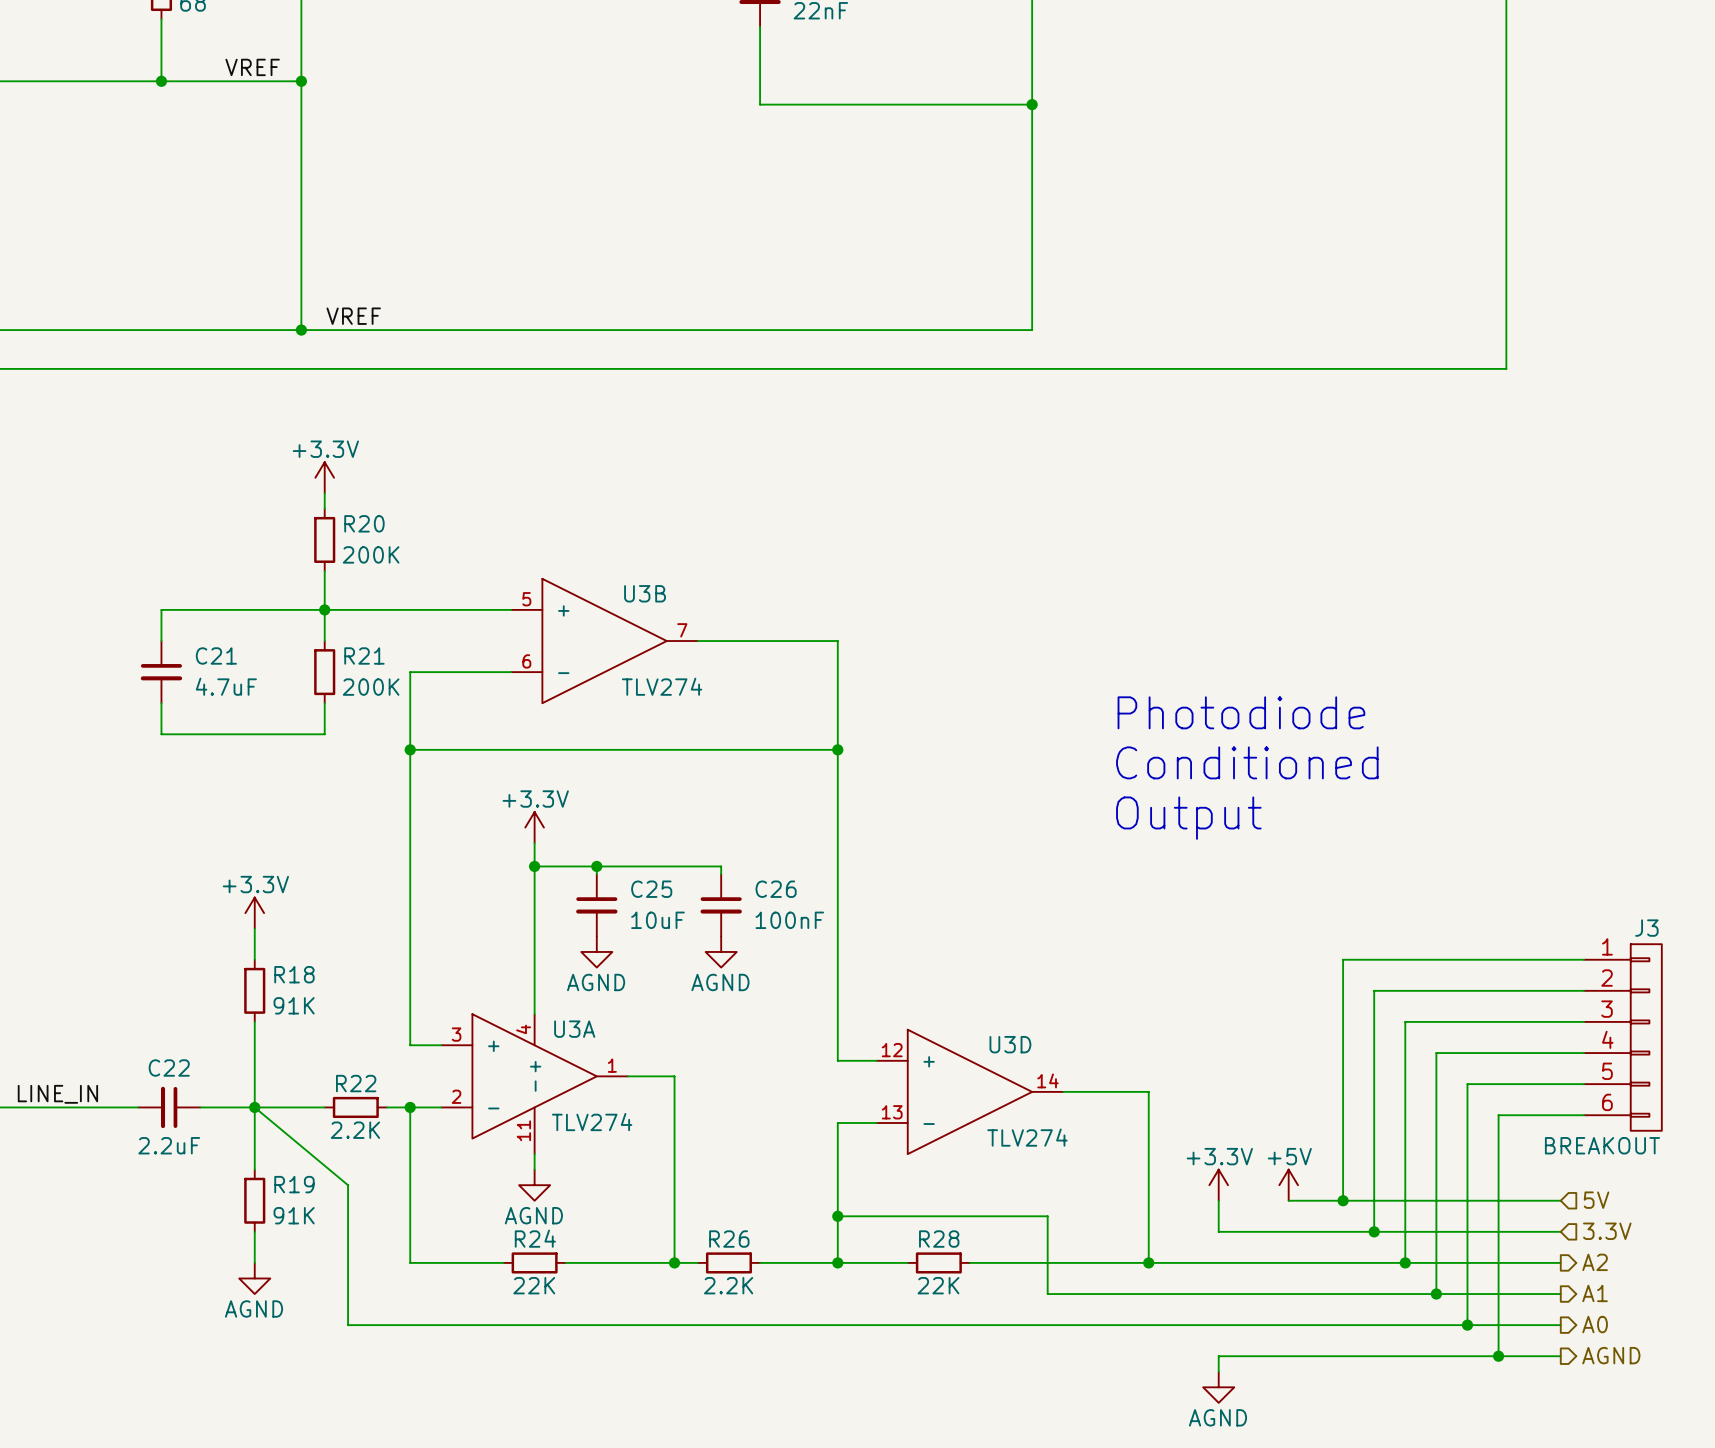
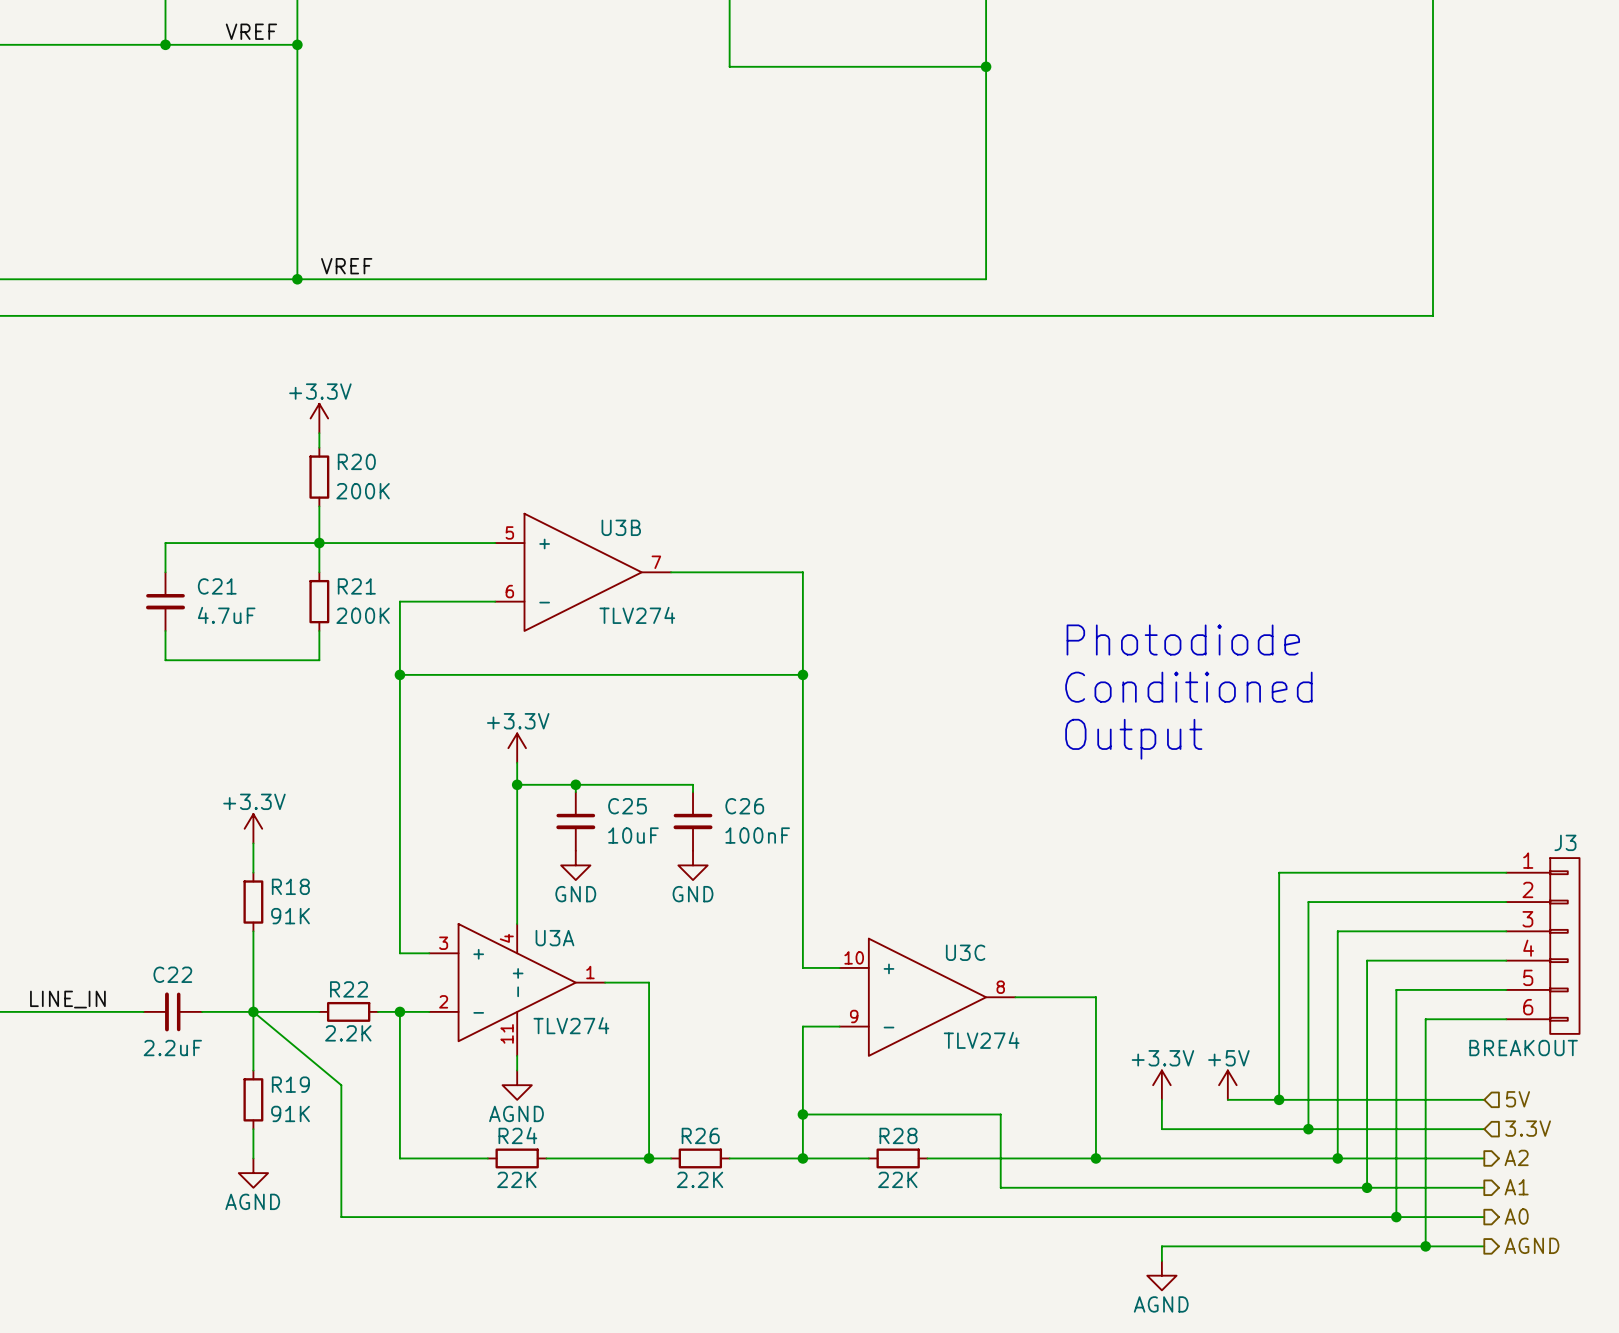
power symbol: AGND (596, 951) -> GND (575, 865)
power symbol: AGND (721, 951) -> GND (693, 865)
U3D name: U3D (1010, 1044) -> U3C (965, 952)
U3D pin number: 12 (892, 1050) -> 10 (854, 957)
U3D pin number: 14 (1047, 1080) -> 8 (1000, 987)
U3D pin number: 13 (892, 1112) -> 9 (854, 1016)

